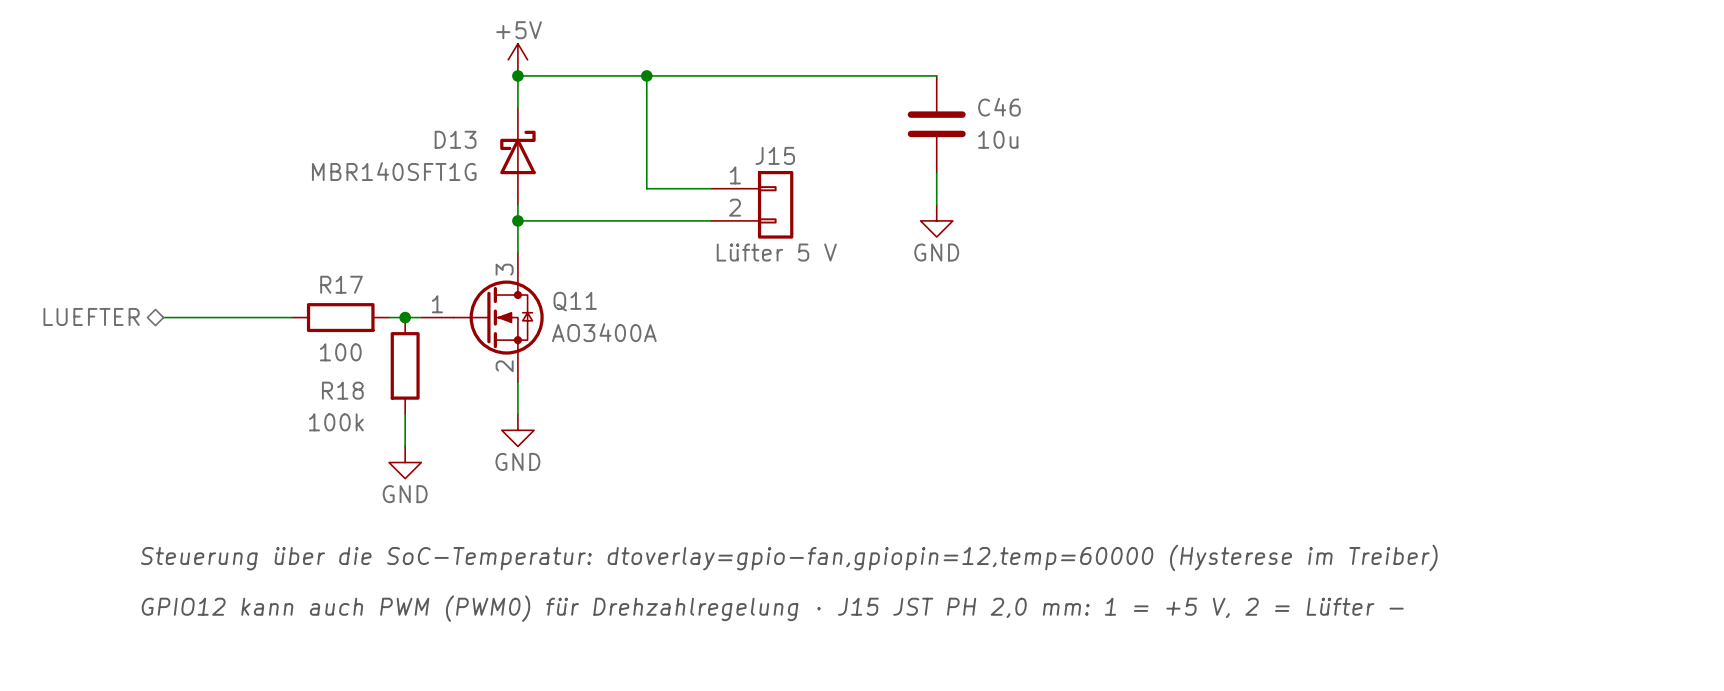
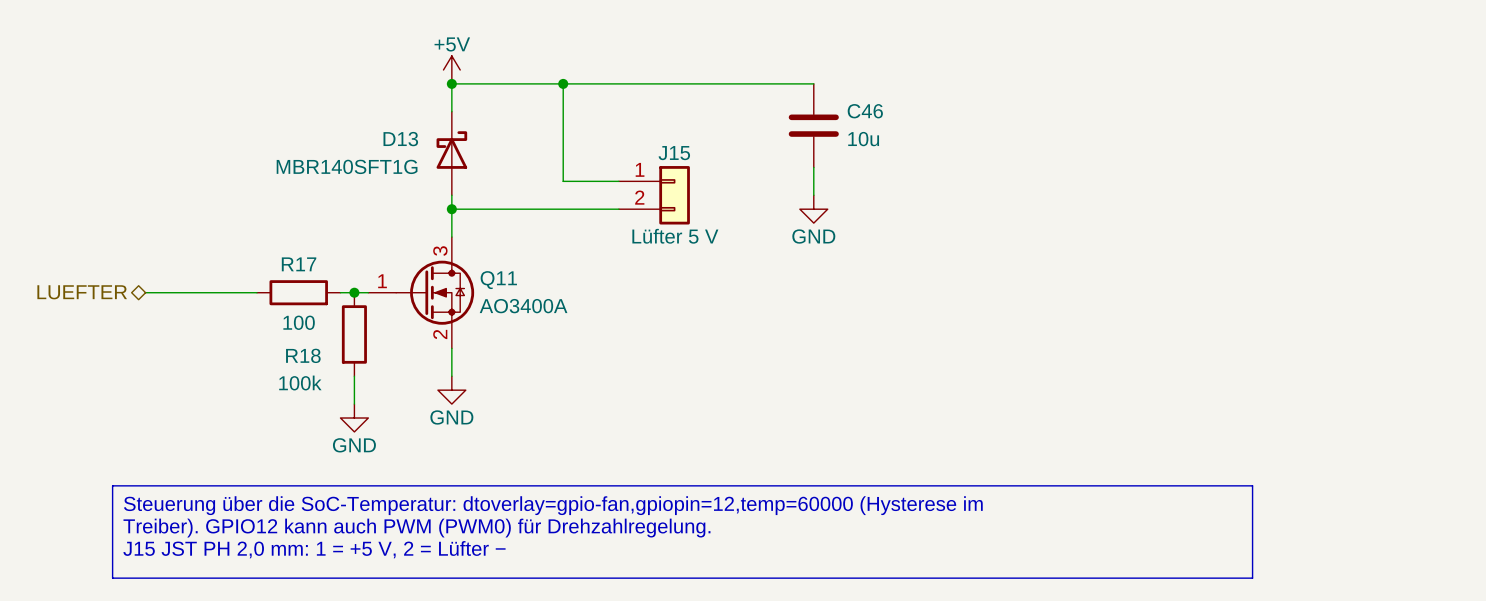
line: none -> (112, 485) (1252, 485) (1252, 578) (112, 578) (112, 485)
text: Steuerung über die SoC-Temperatur: dtoverlay=gpio-fan,gpiopin=12,temp=60000 (Hysterese im Treiber) (789, 557) -> Steuerung über die SoC-Temperatur: dtoverlay=gpio-fan,gpiopin=12,temp=60000 (Hysterese im (553, 505)
text: none -> Treiber). GPIO12 kann auch PWM (PWM0) für Drehzahlregelung. (416, 528)
text: GPIO12 kann auch PWM (PWM0) für Drehzahlregelung · J15 JST PH 2,0 mm: 1 = +5 V, 2 = Lüfter − (772, 608) -> J15 JST PH 2,0 mm: 1 = +5 V, 2 = Lüfter − (314, 549)

